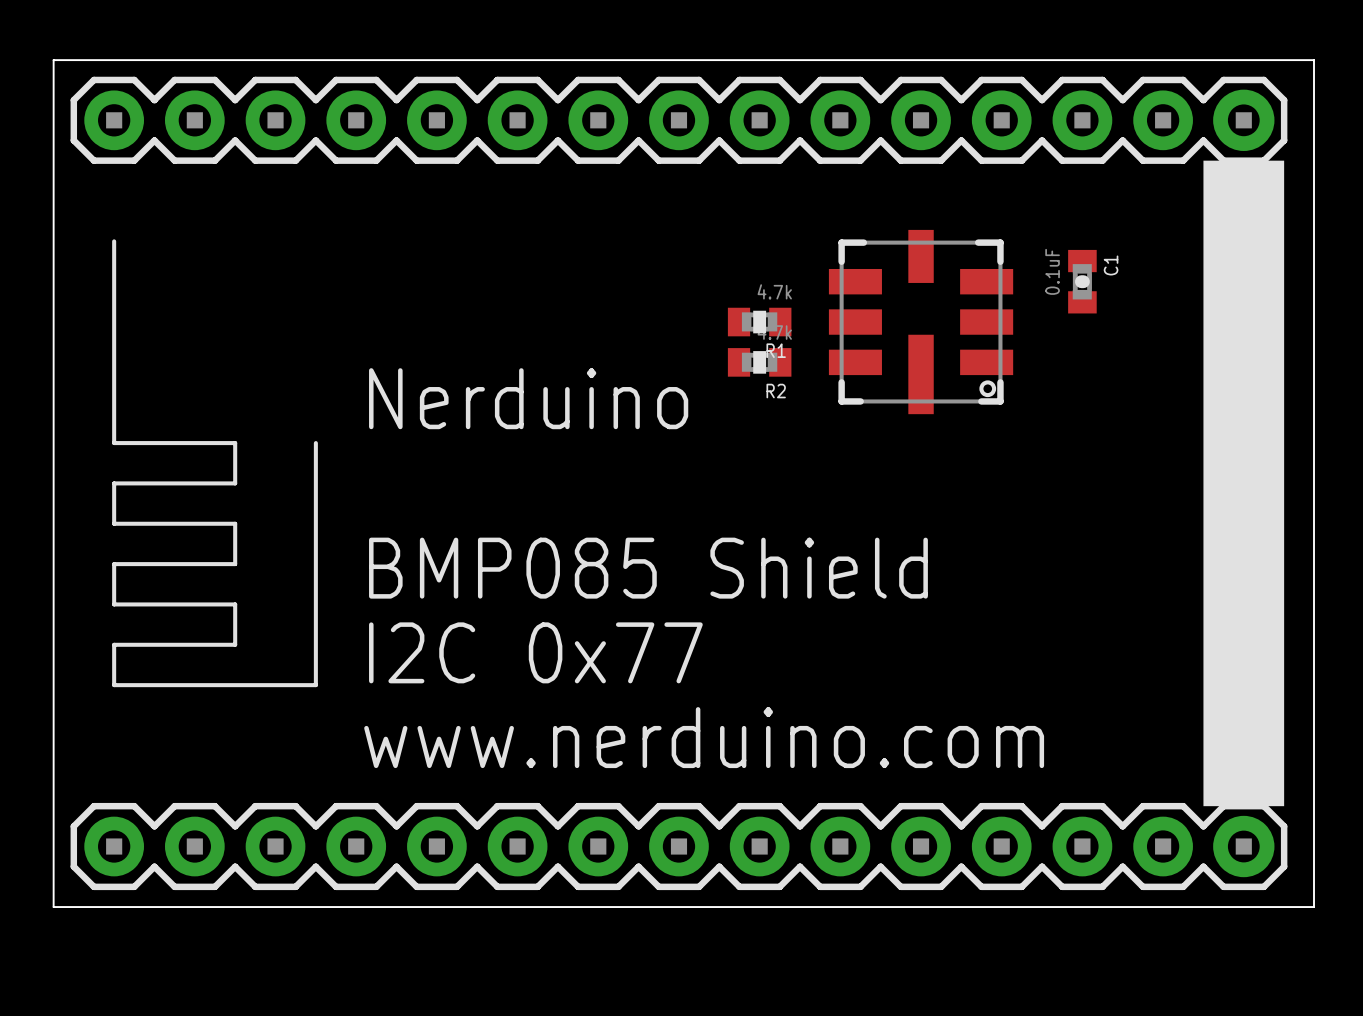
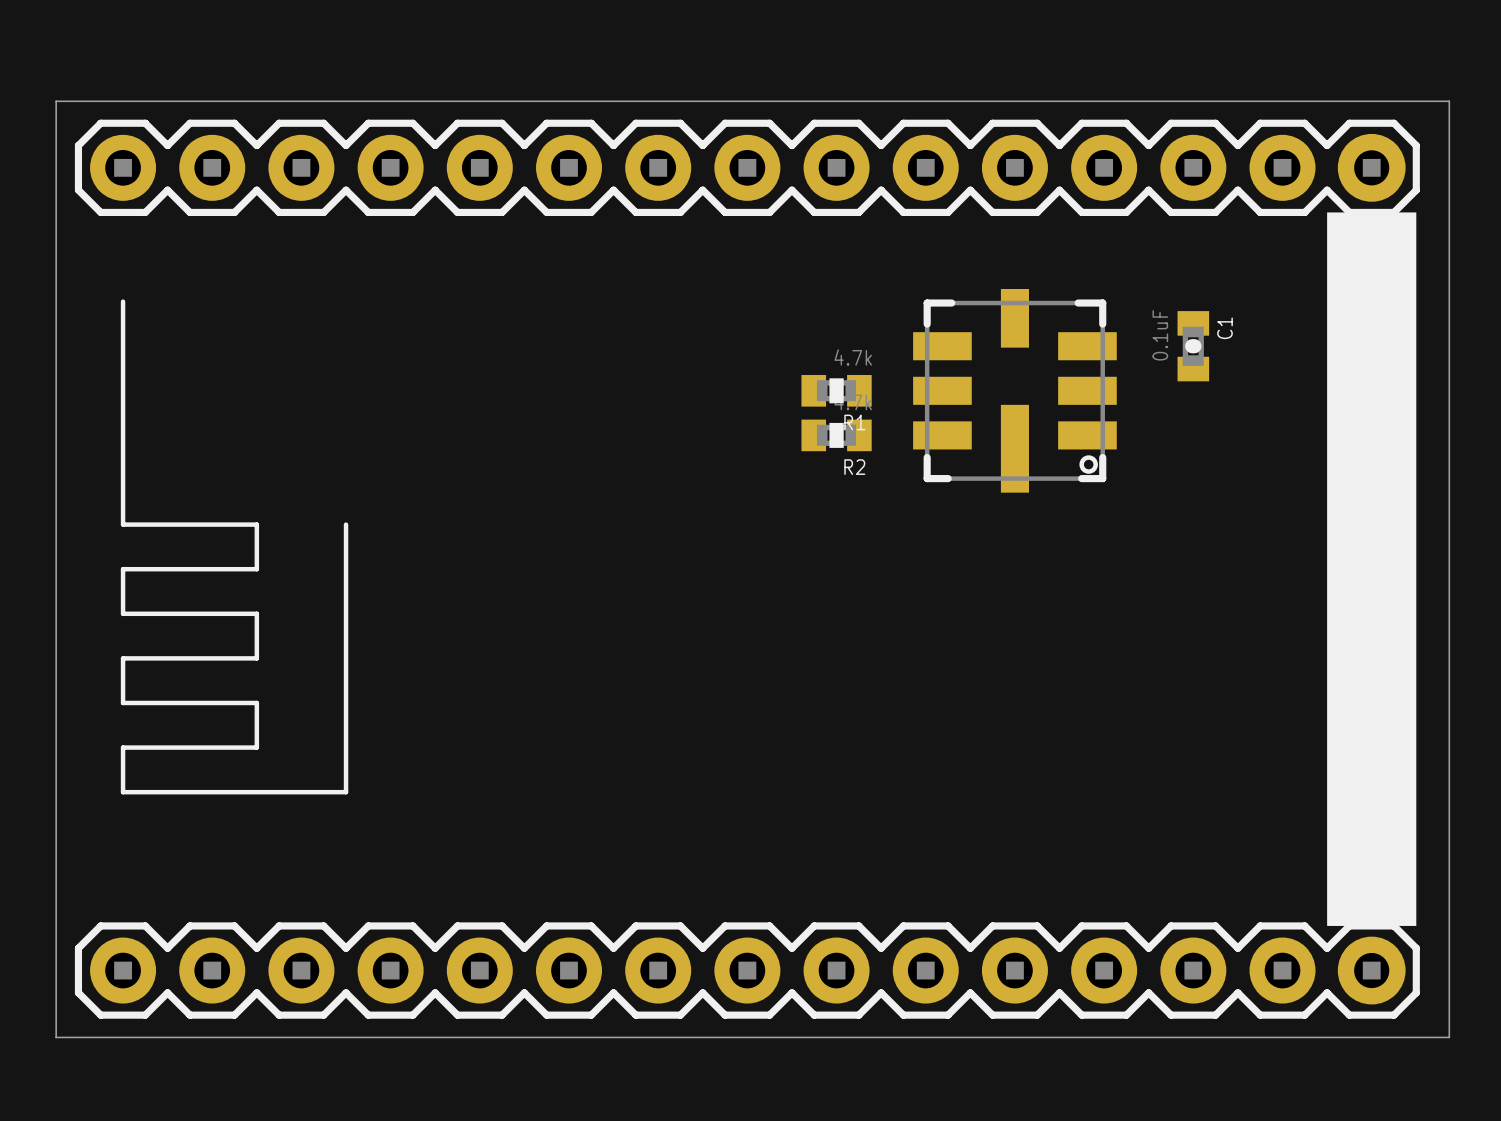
text: Nerduino (528, 398) -> none
text: BMP085 Shield (648, 568) -> none
text: I2C 0x77 (535, 652) -> none
text: www.nerduino.com (704, 737) -> none

